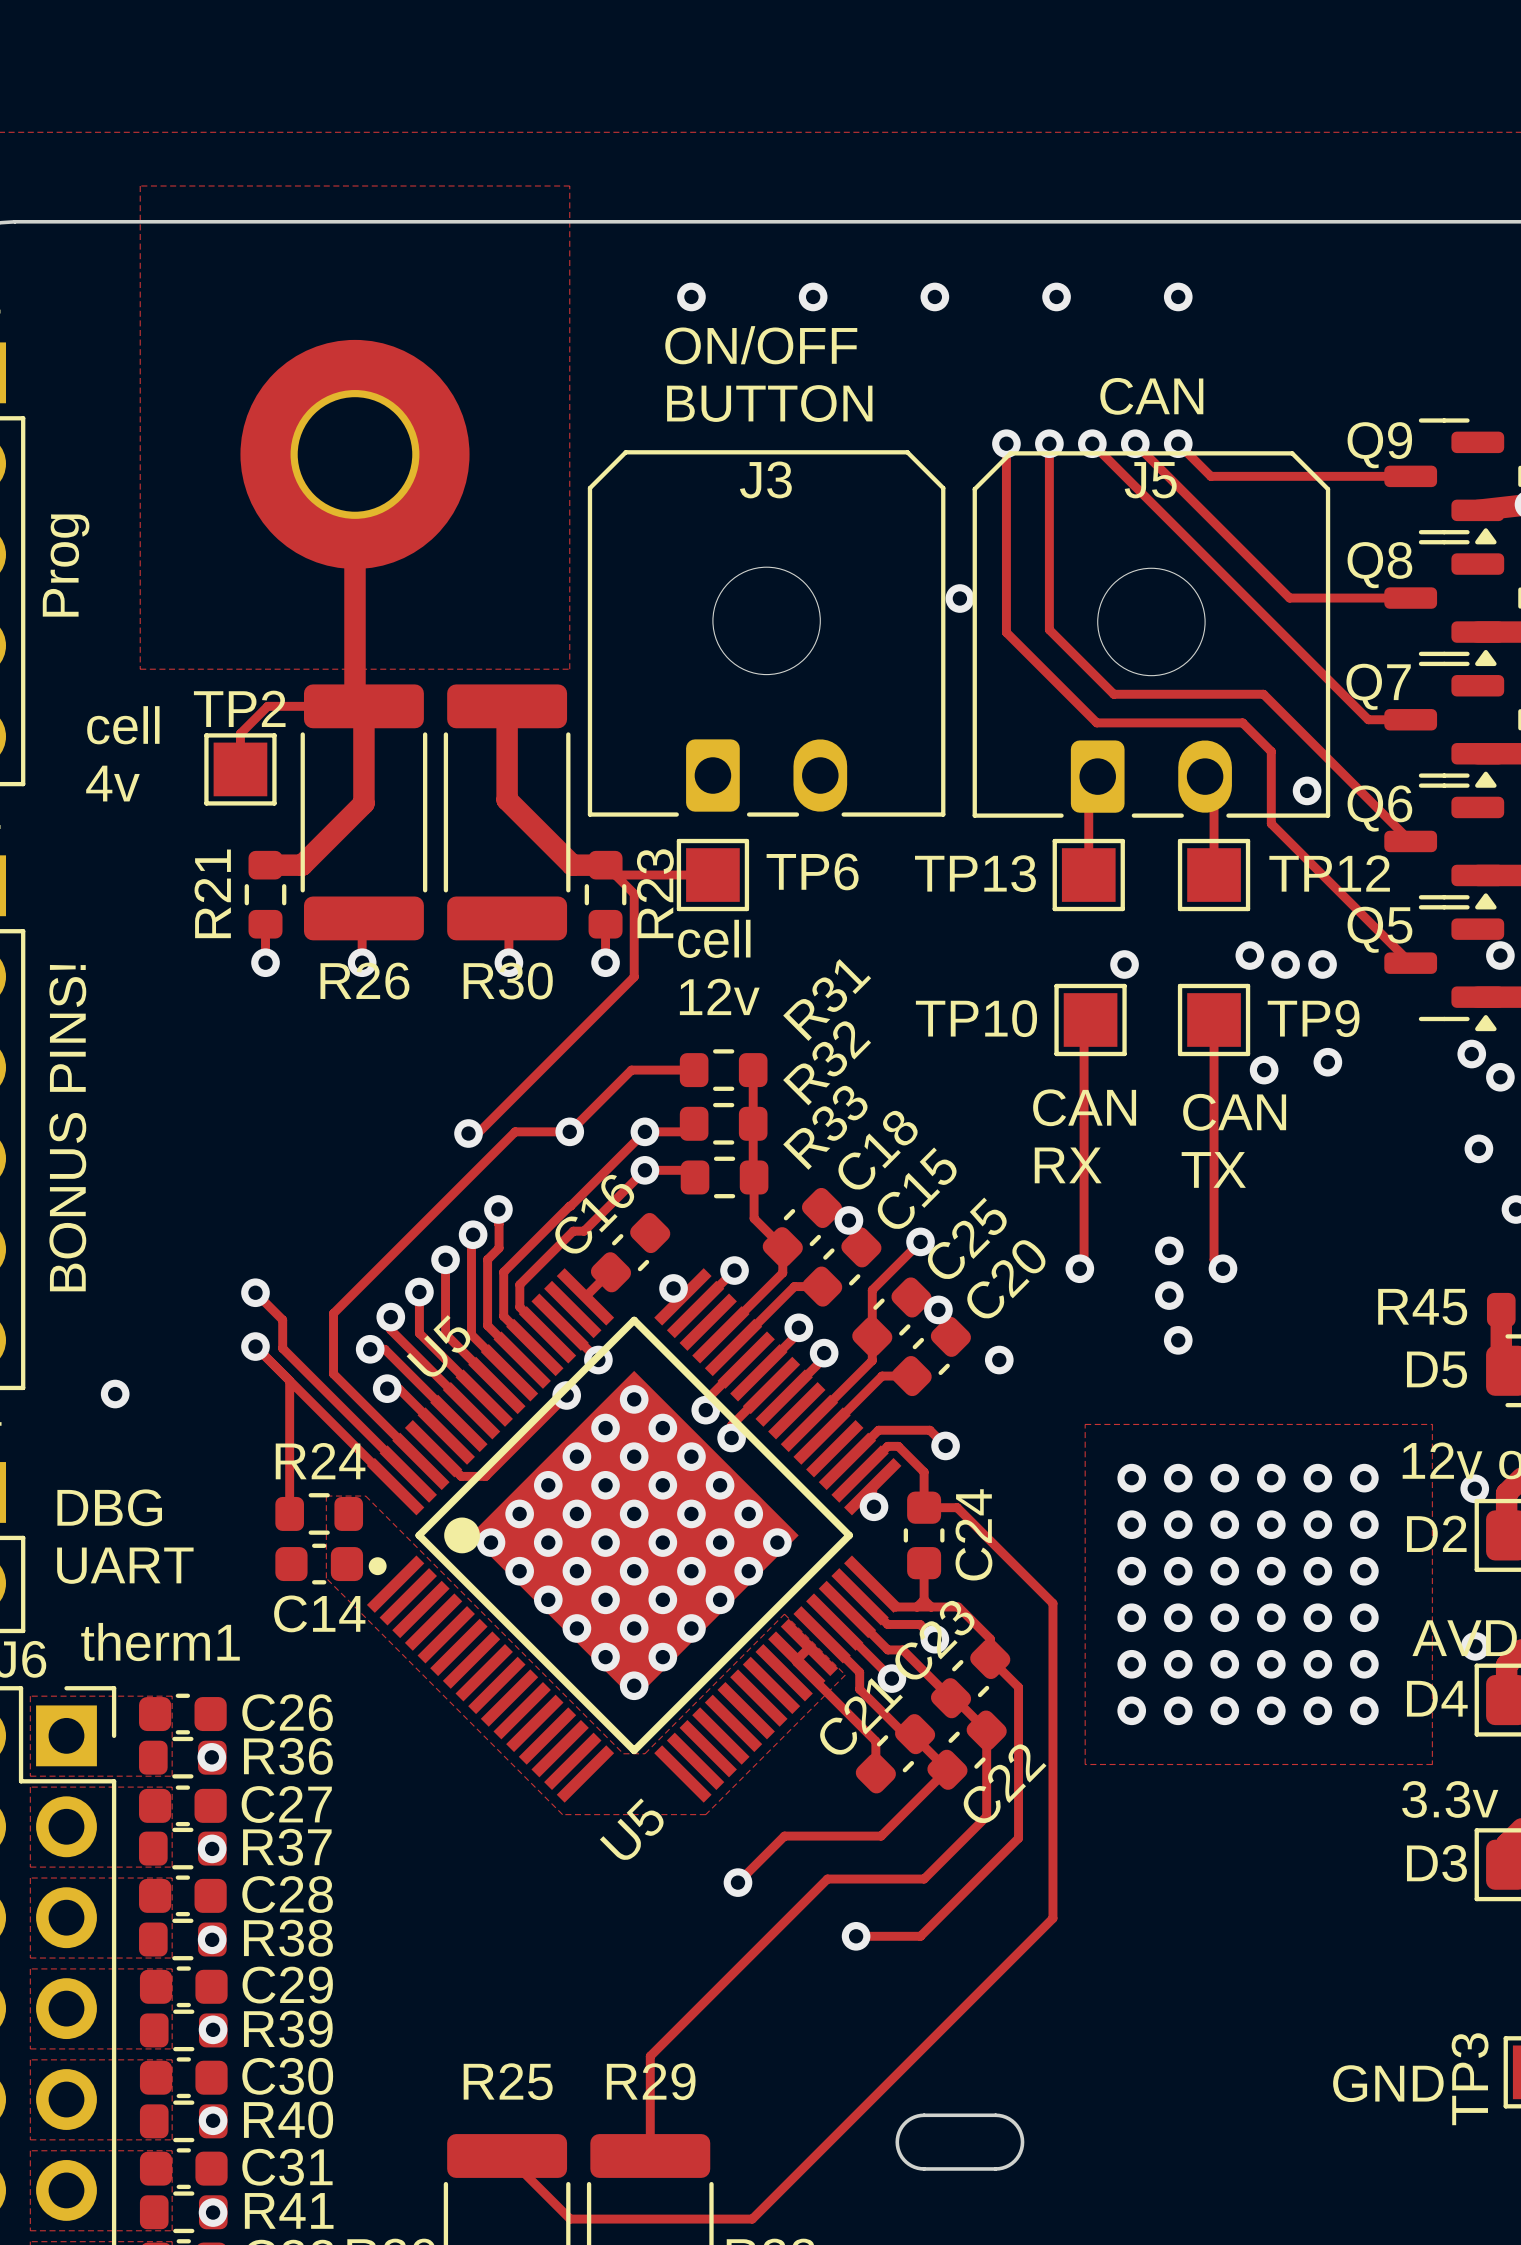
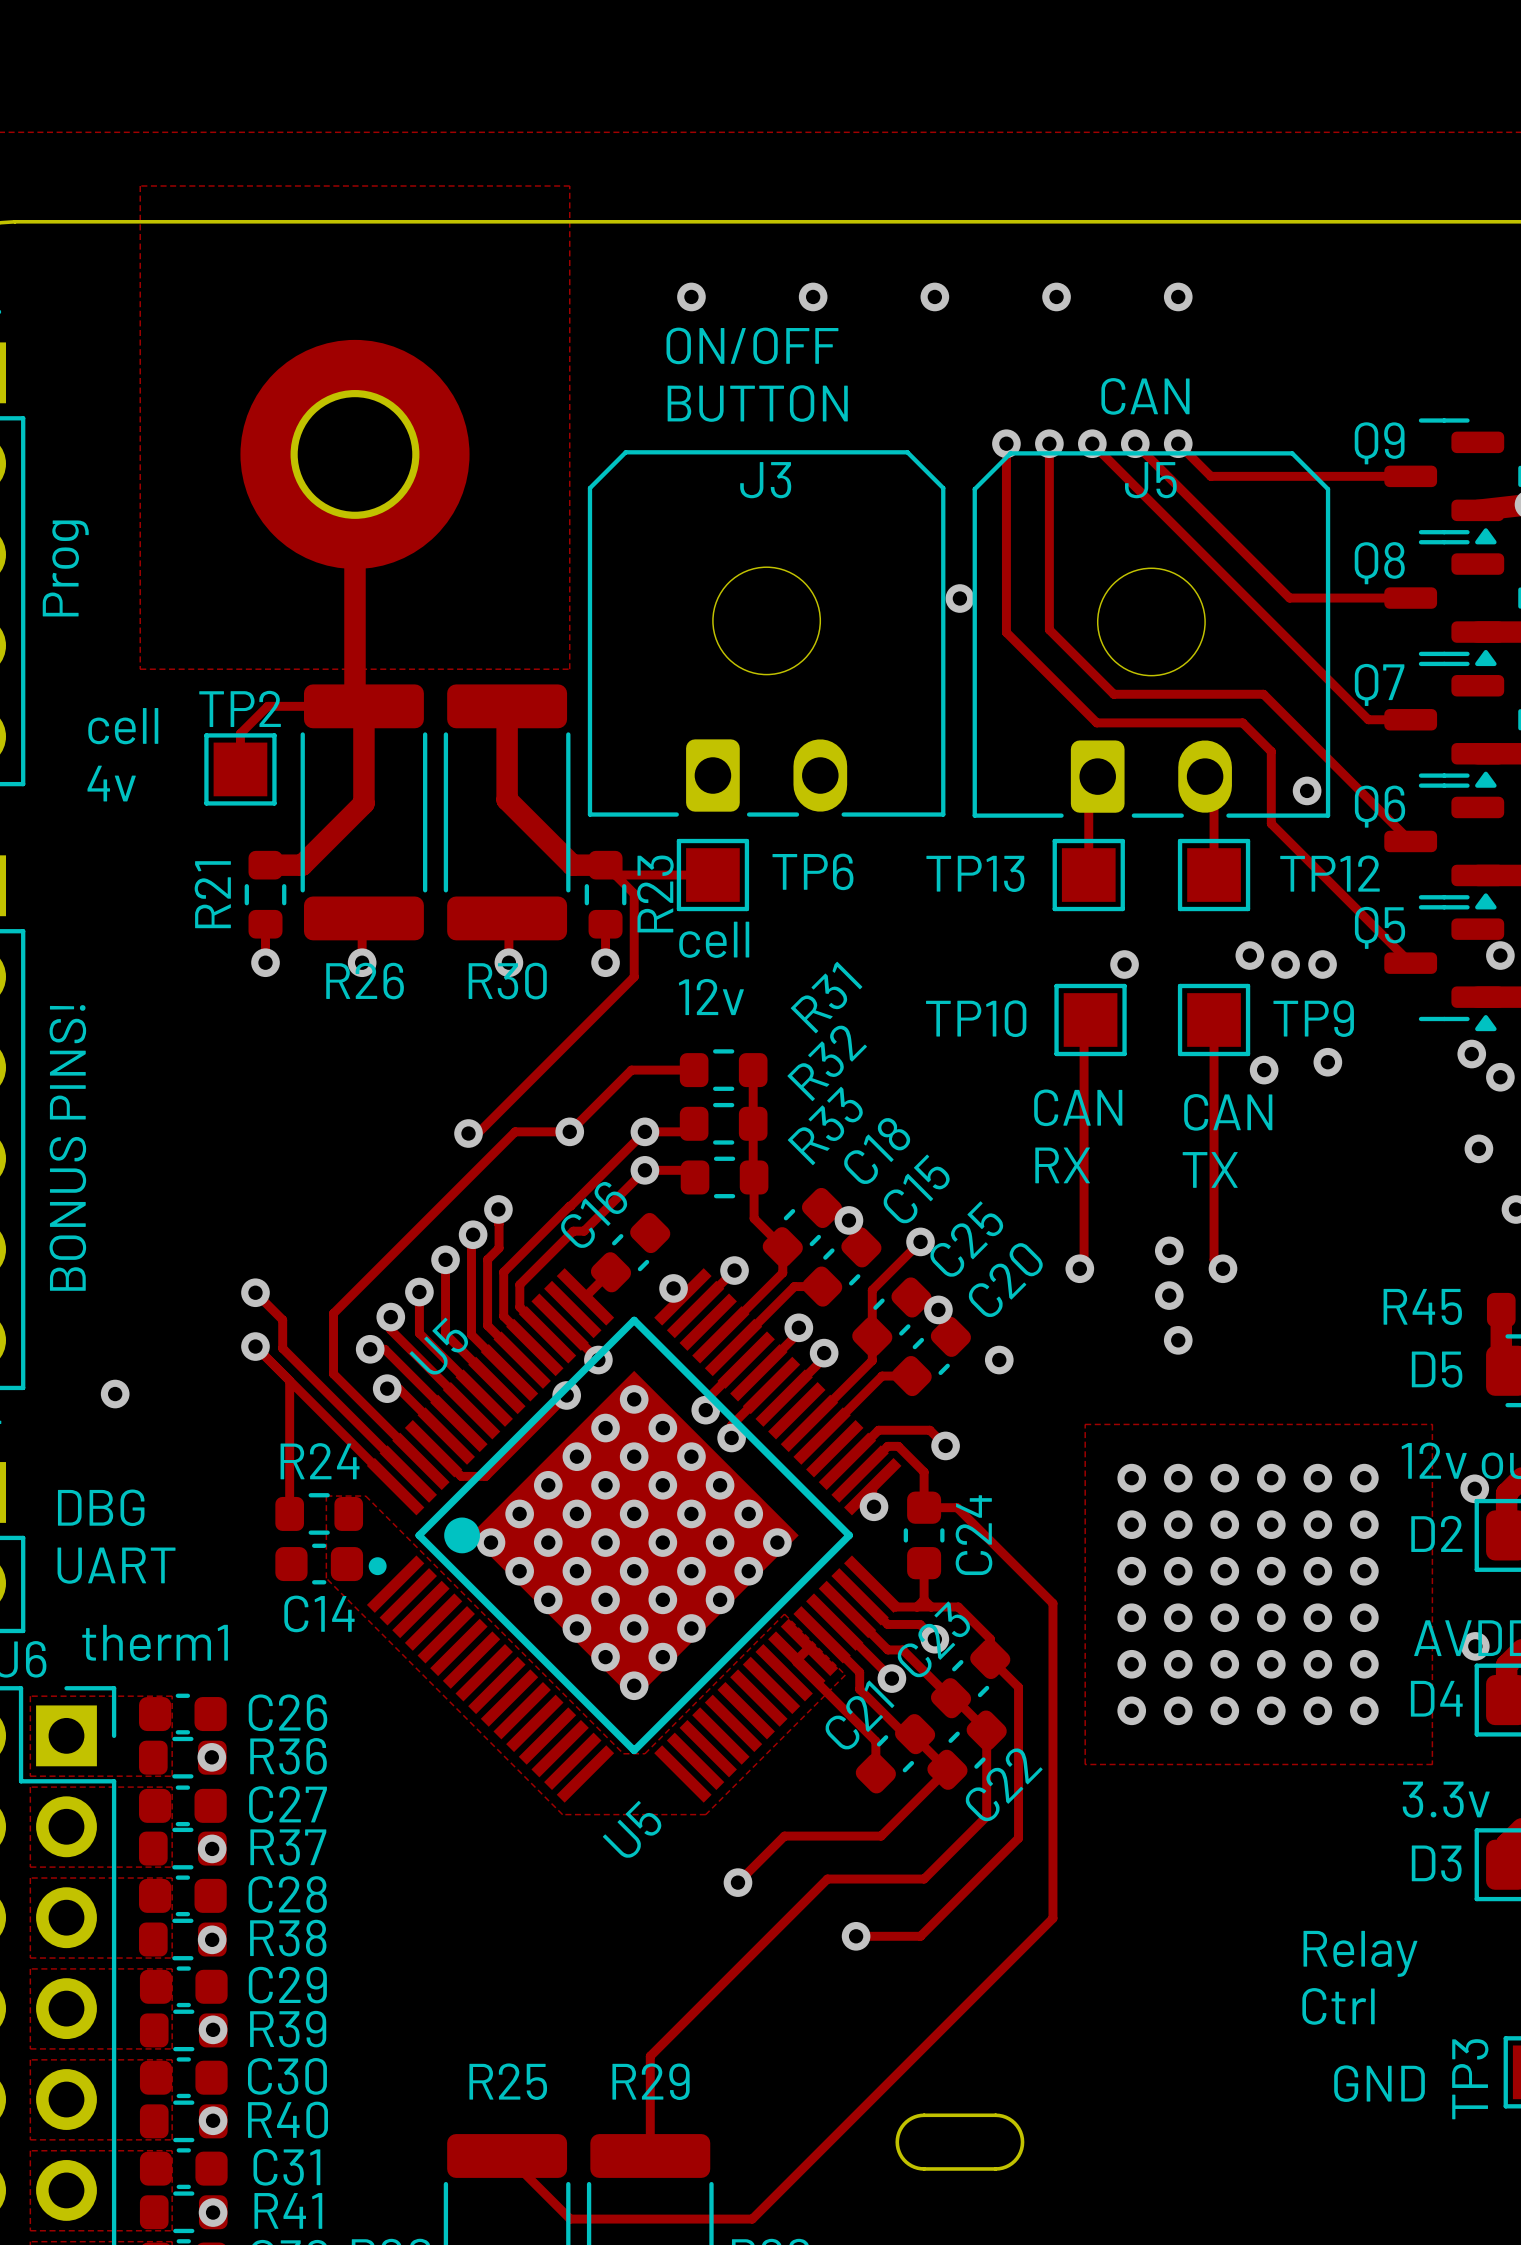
text: none -> Relay (1360, 1953)
text: none -> Ctrl (1338, 2006)

